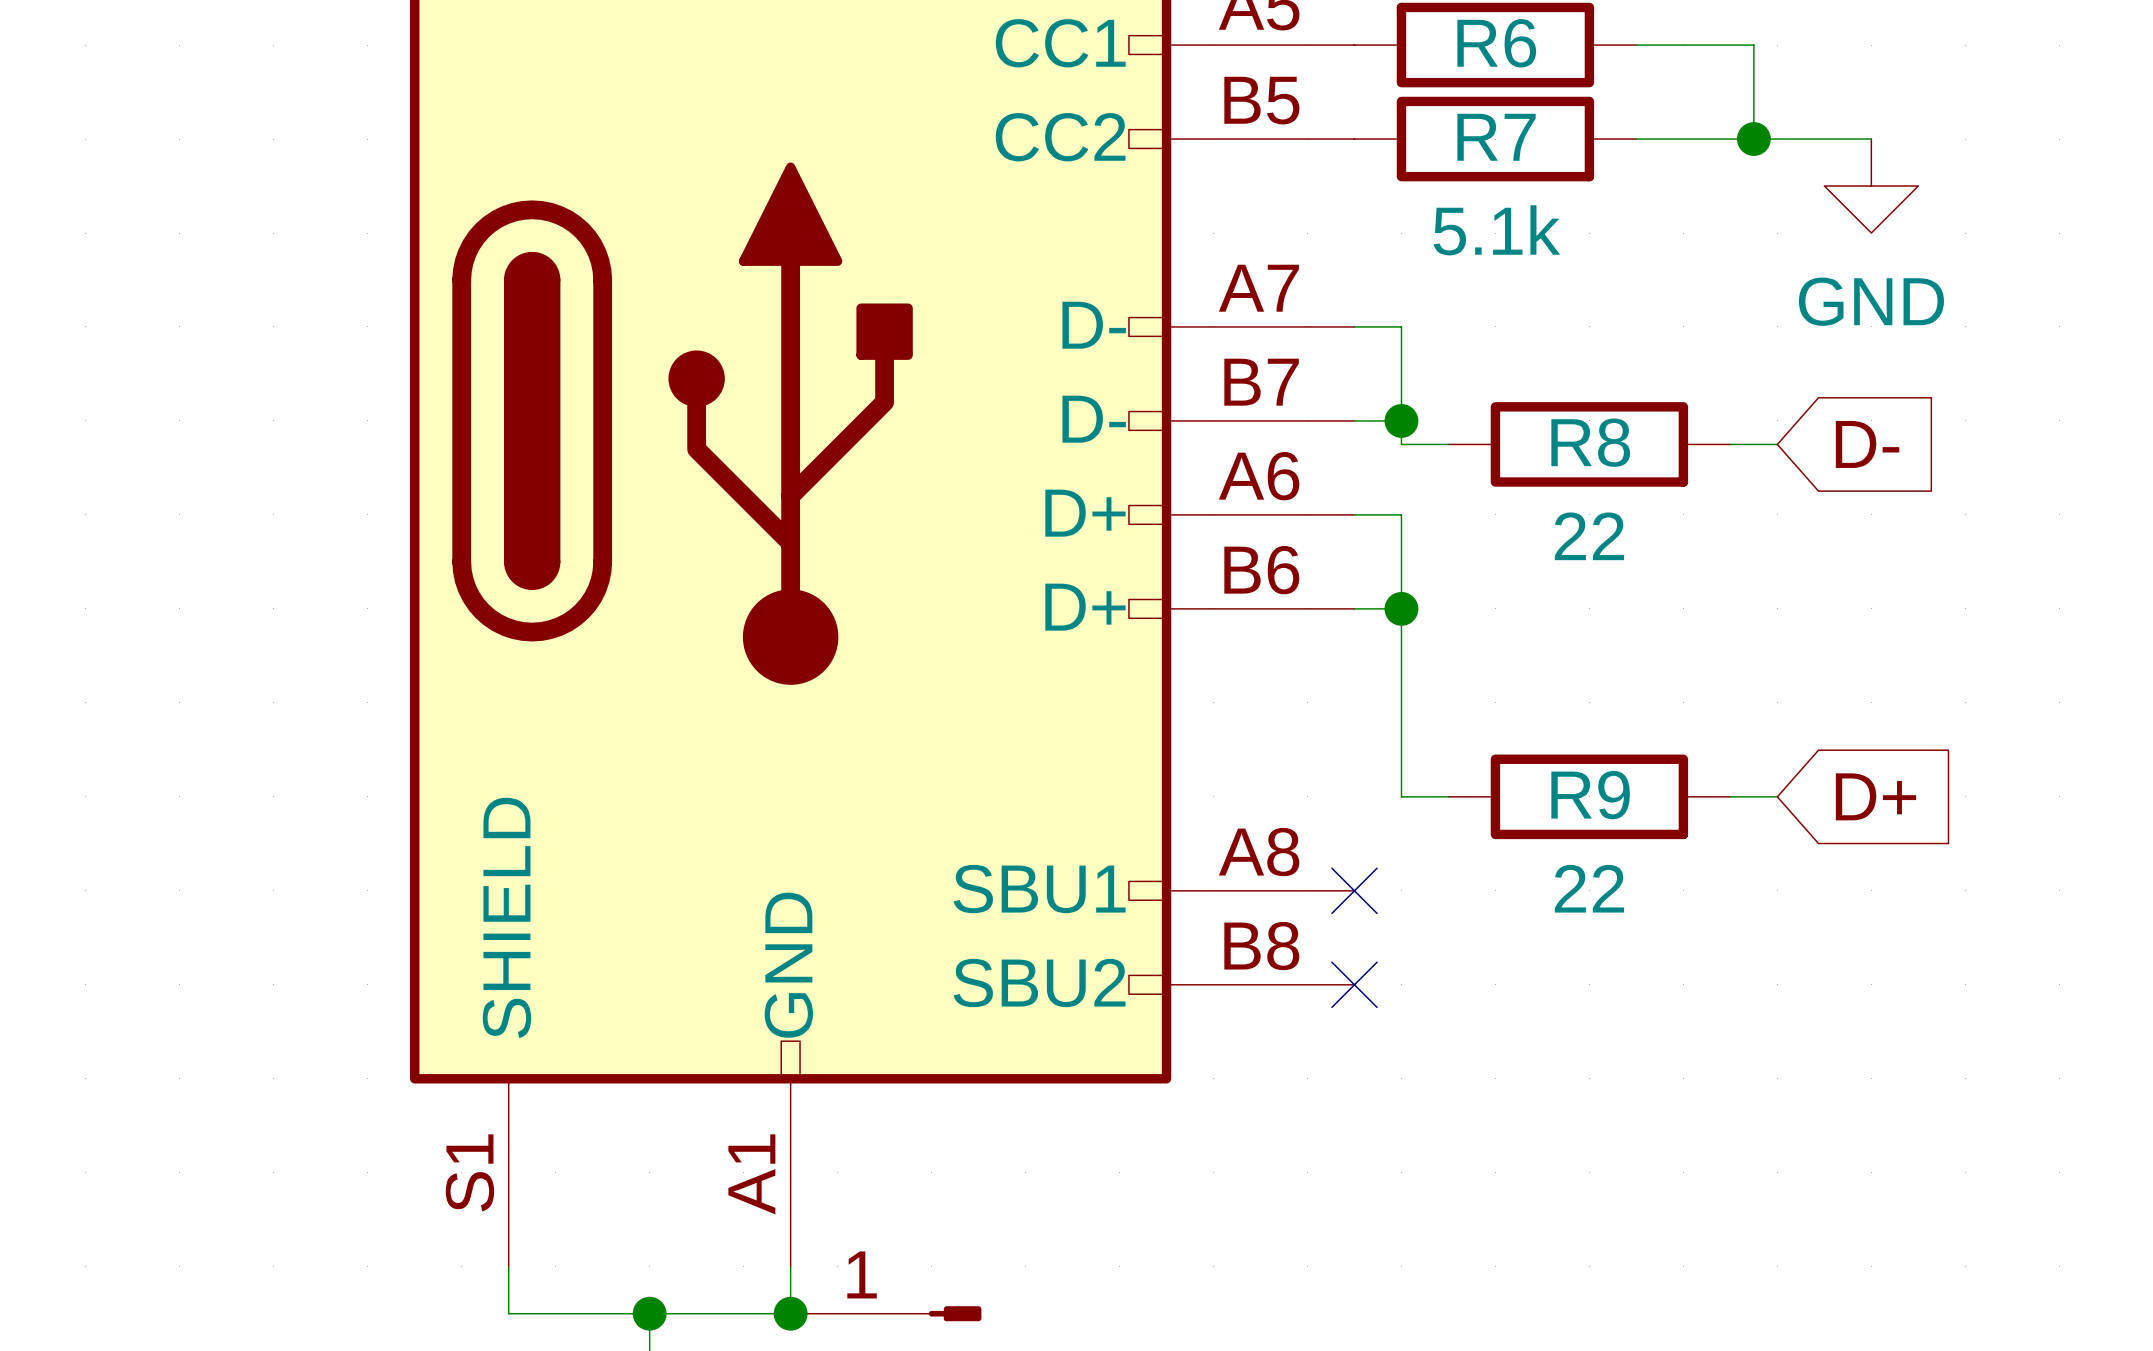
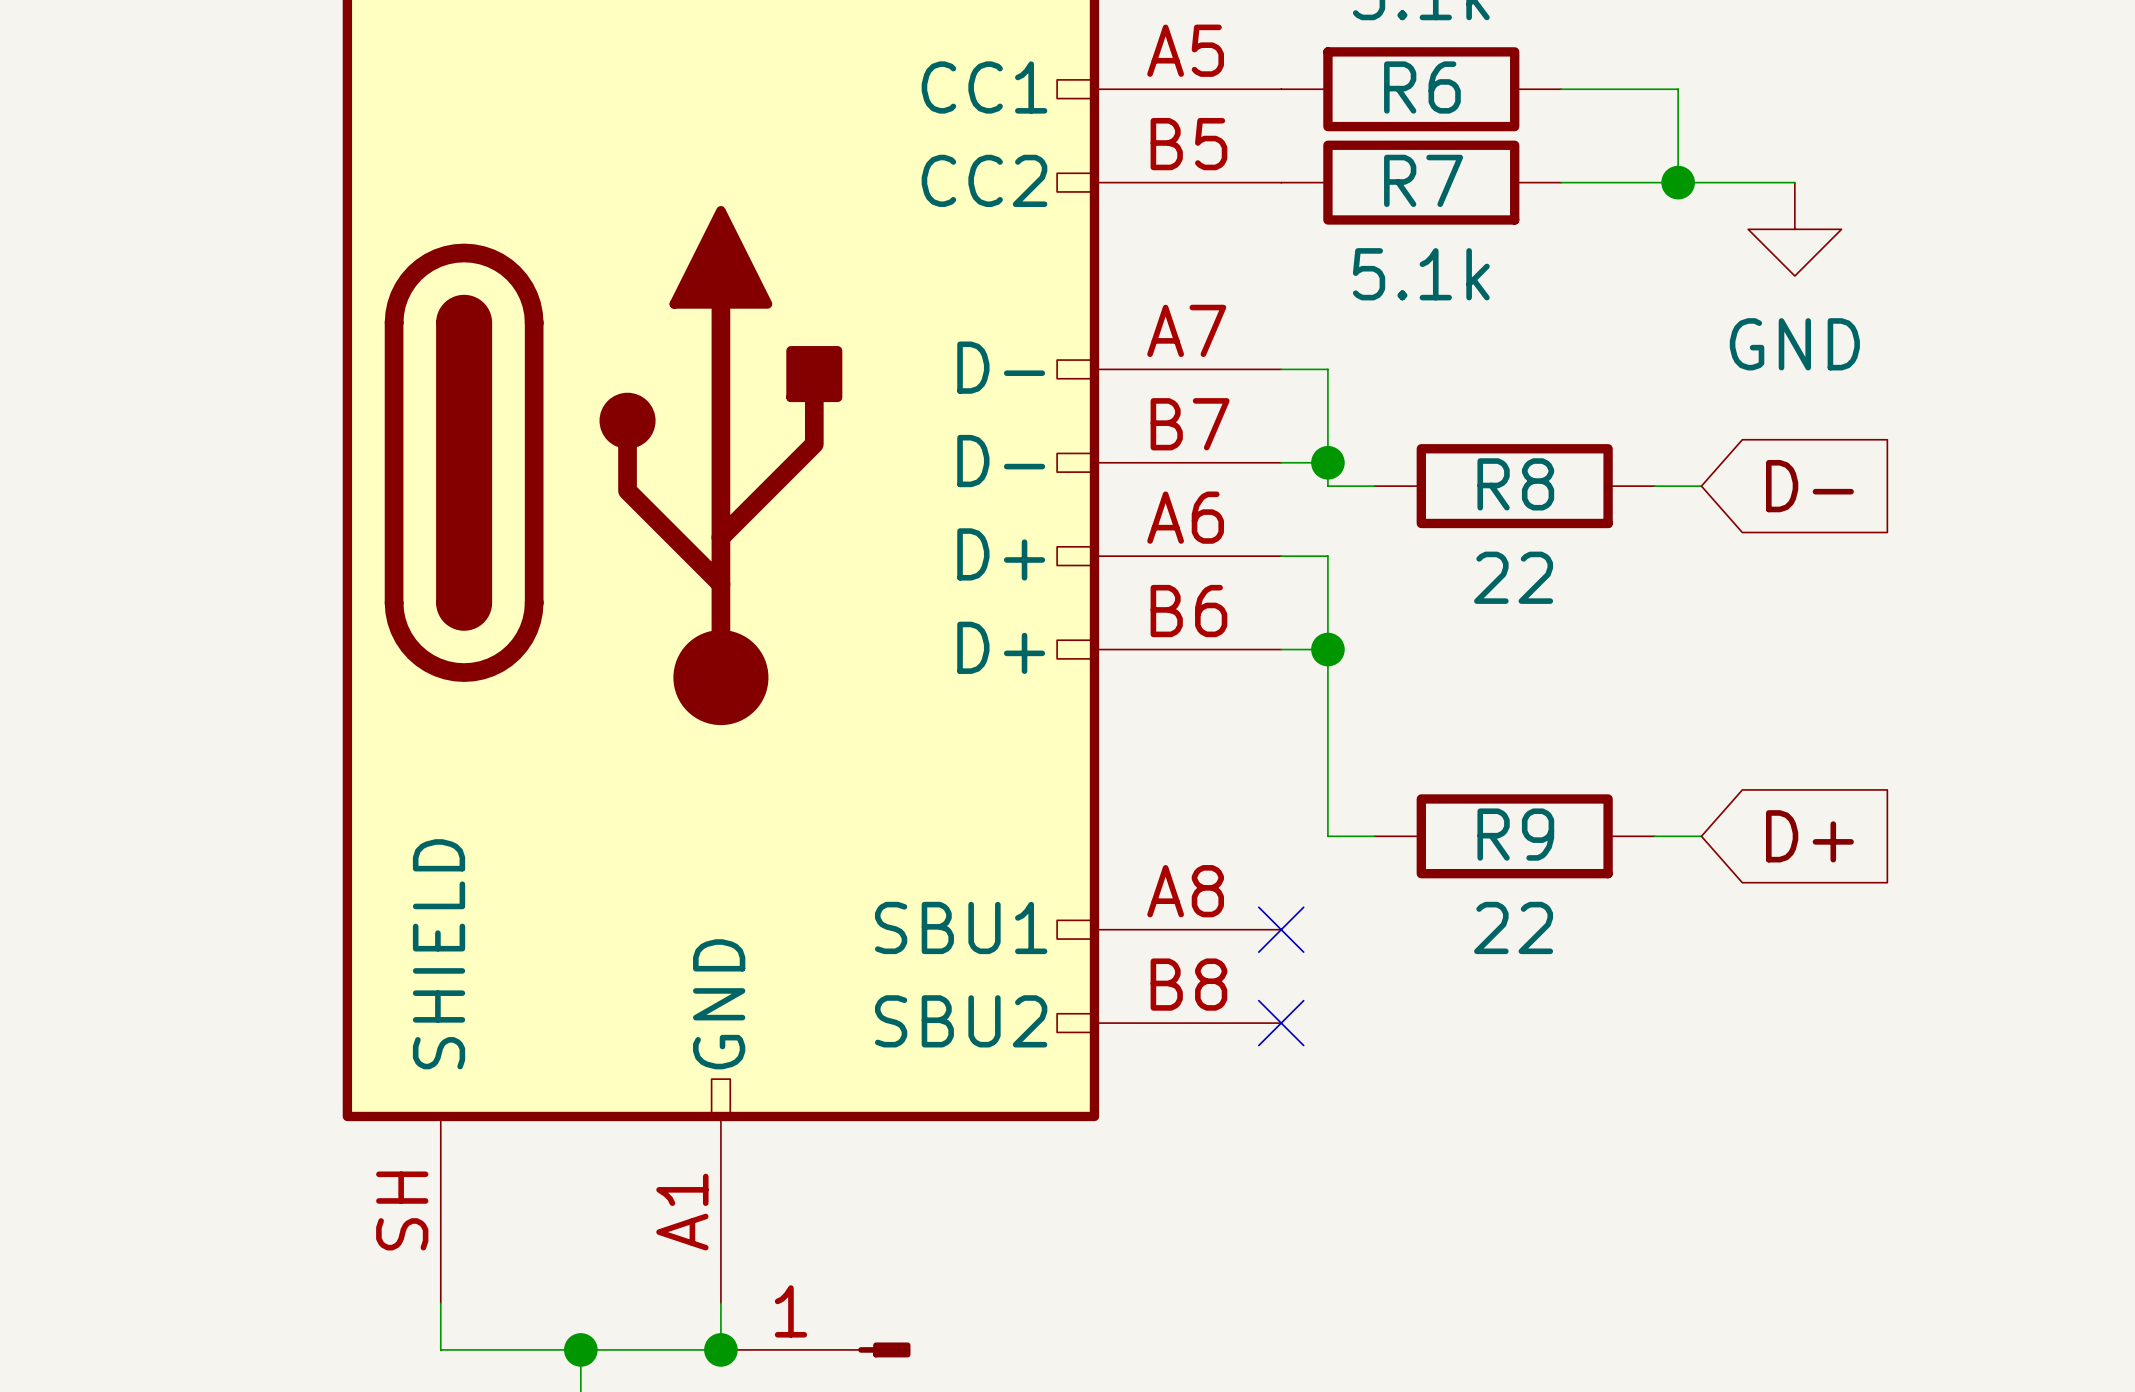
part pin number: S1 (469, 1172) -> SH (402, 1210)

